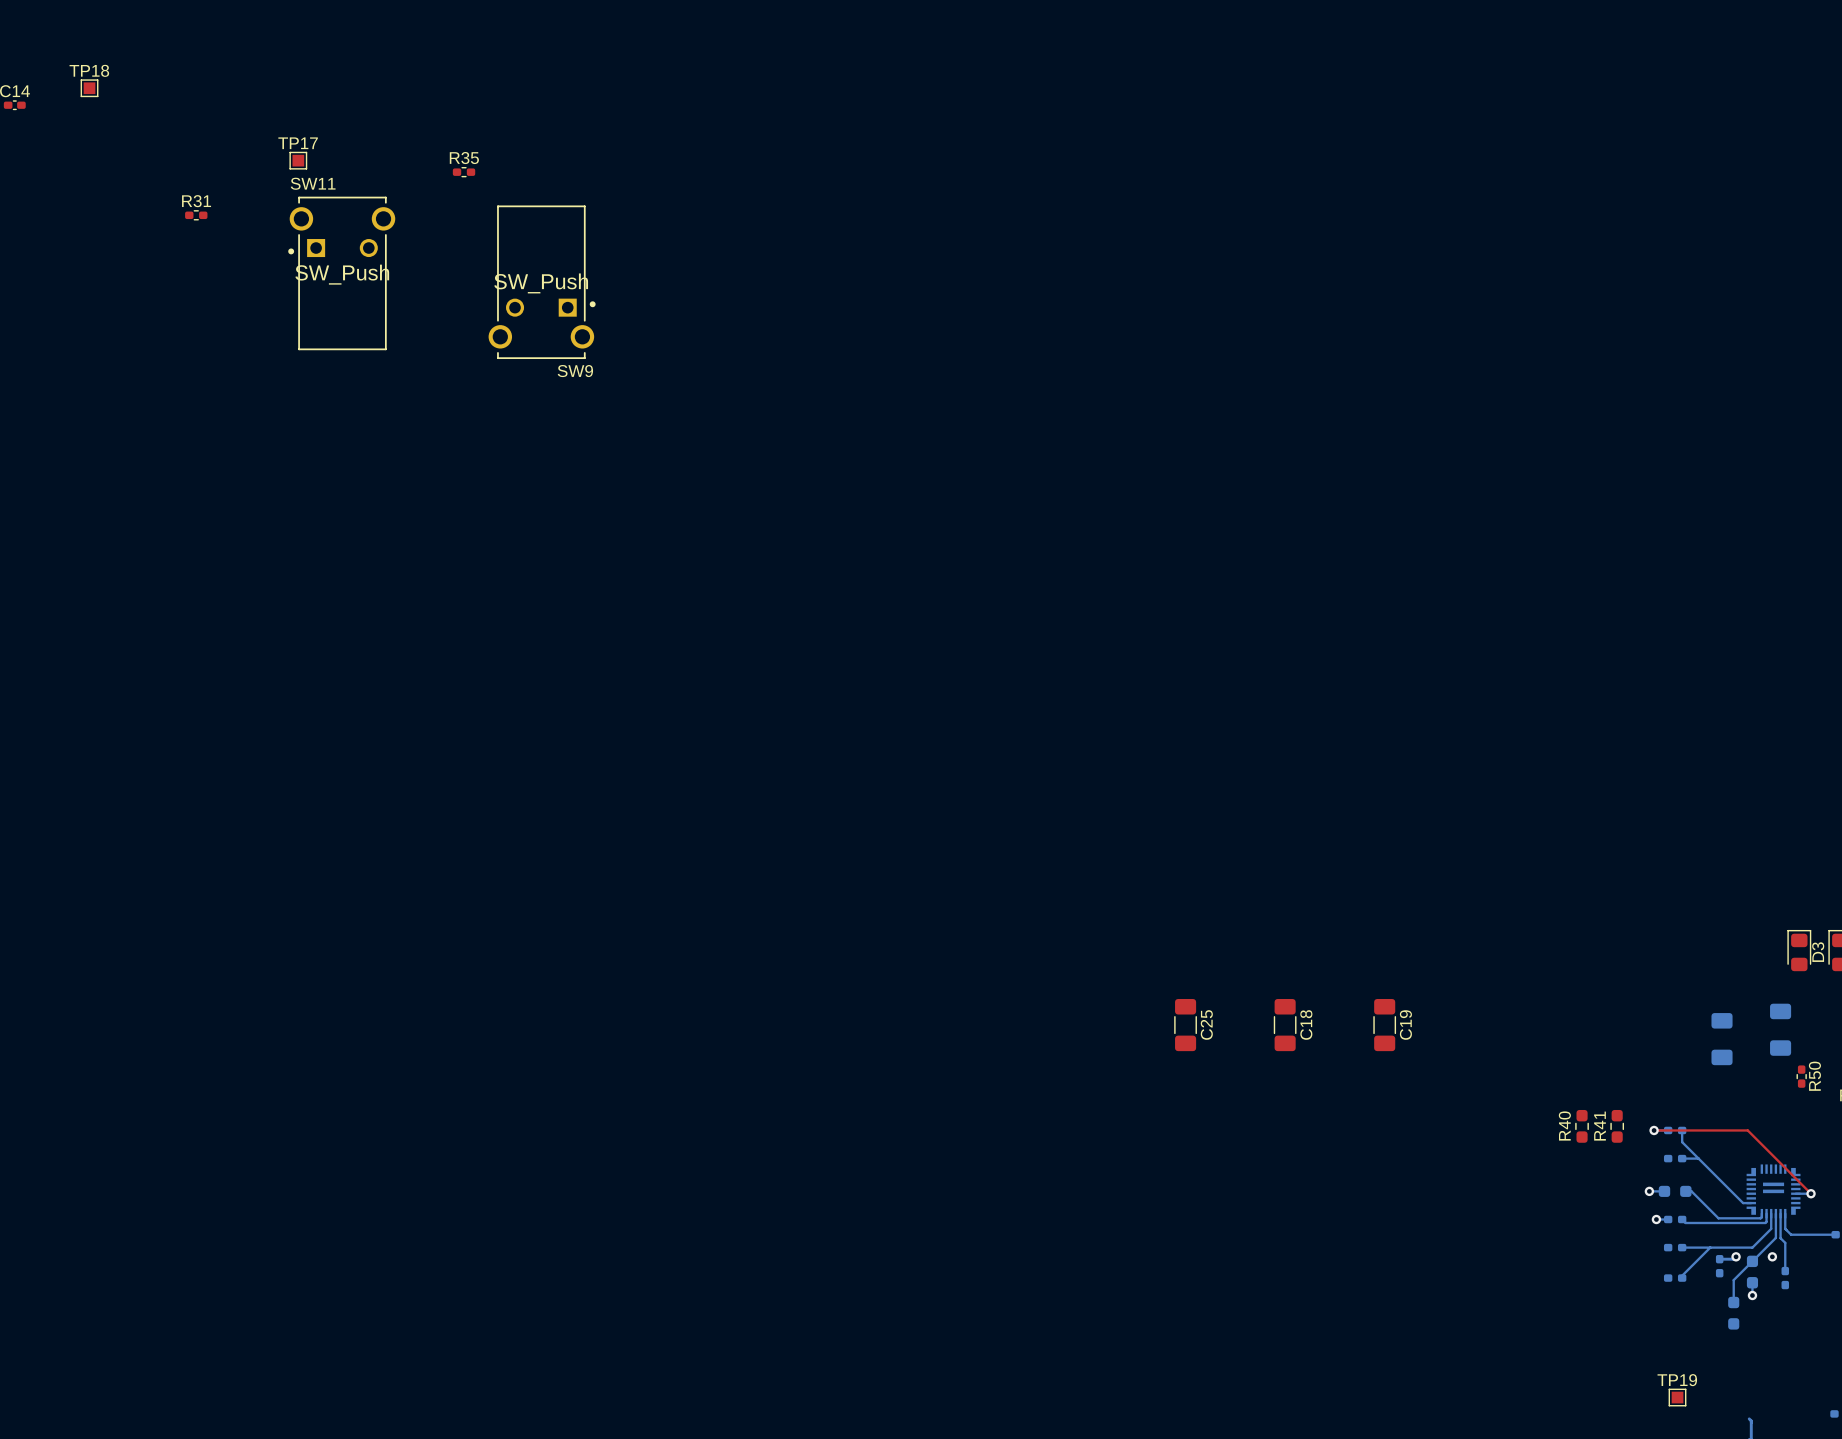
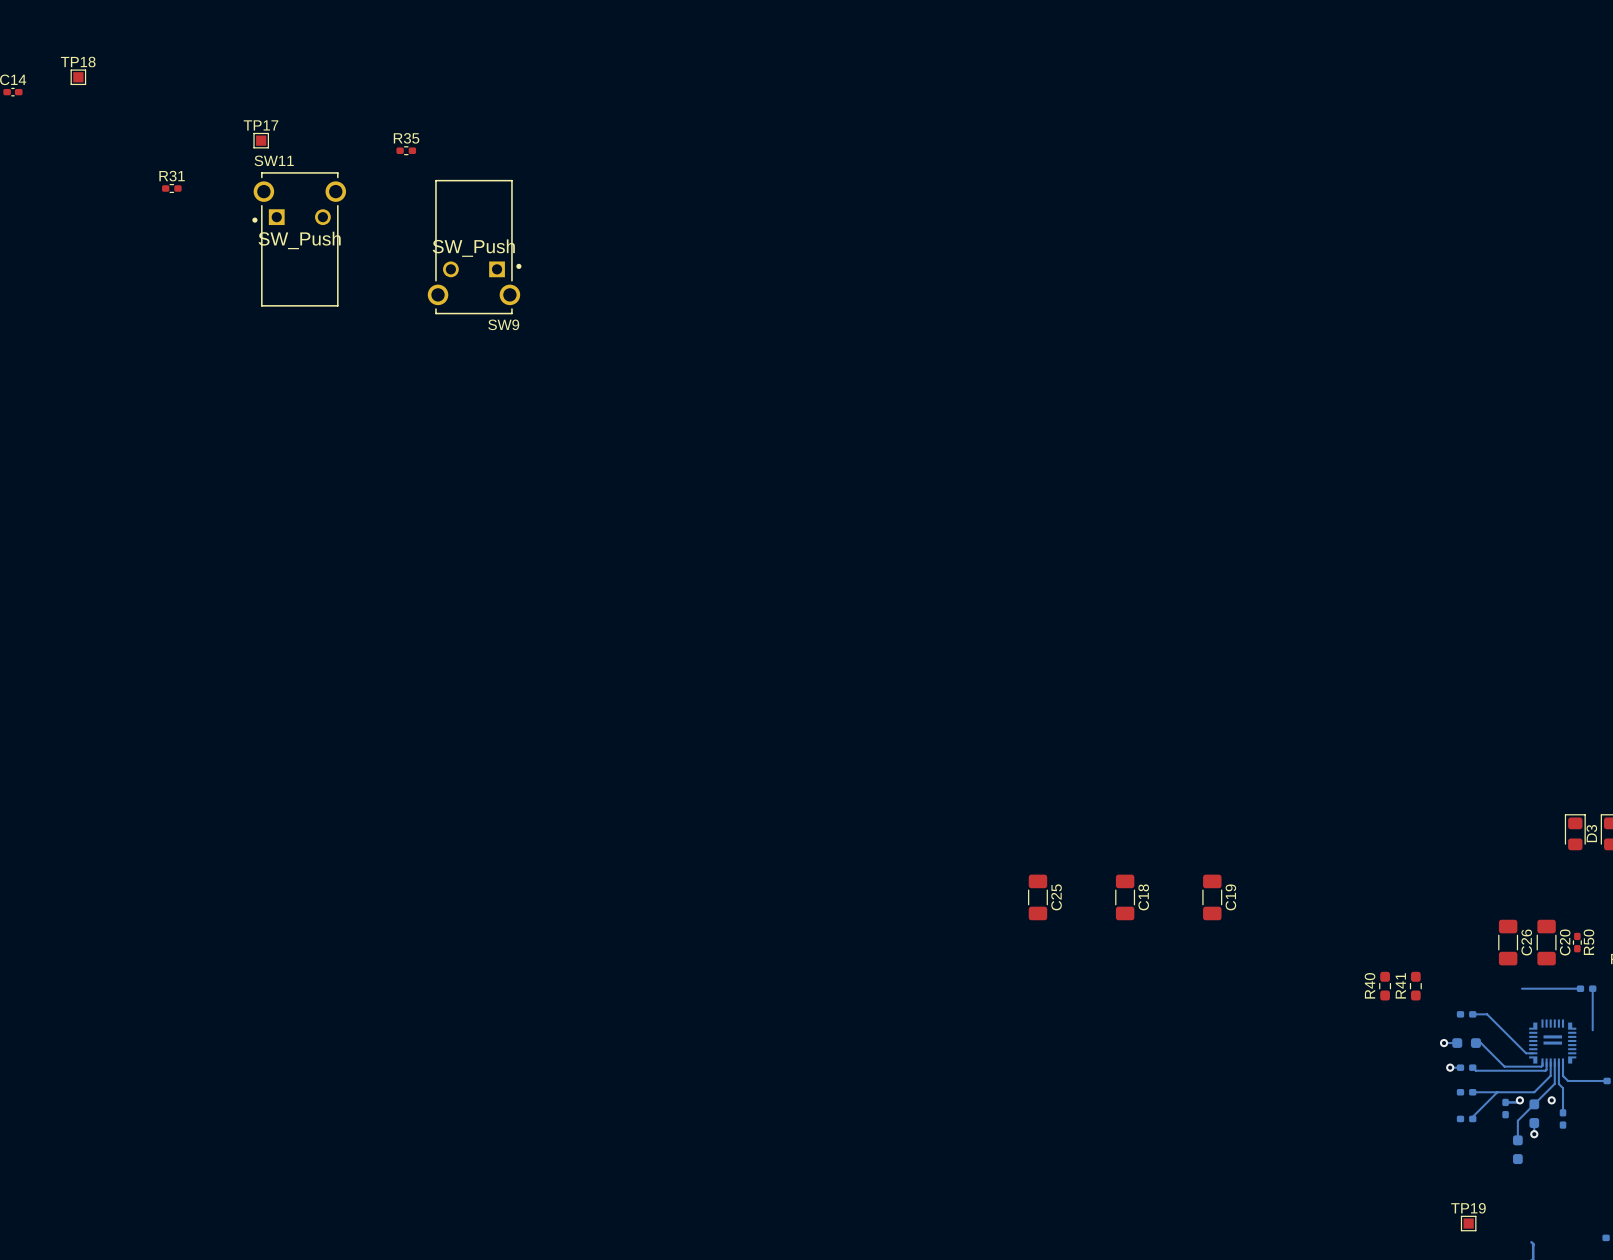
C20 side: bottom (1780, 1029) -> top (1546, 942)
C26 side: bottom (1722, 1039) -> top (1508, 942)
bottom track: none -> (1522, 988) (1580, 988)
bottom track: none -> (1592, 988) (1592, 1030)
top track: (1654, 1130) (1747, 1130) (1811, 1193) -> none
via: (1654, 1130) -> none
part position: (1675, 1130) -> (1586, 988)
bottom track: (1682, 1130) (1682, 1142) (1698, 1158) -> none
bottom track: (1795, 1193) (1811, 1193) -> none
via: (1811, 1193) -> none

